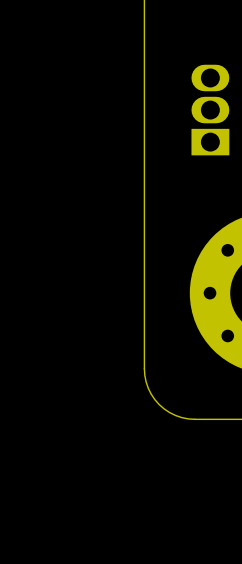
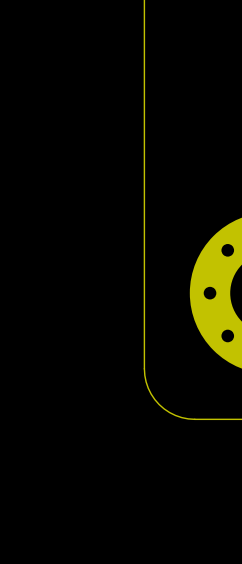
part: (210, 110) -> none

